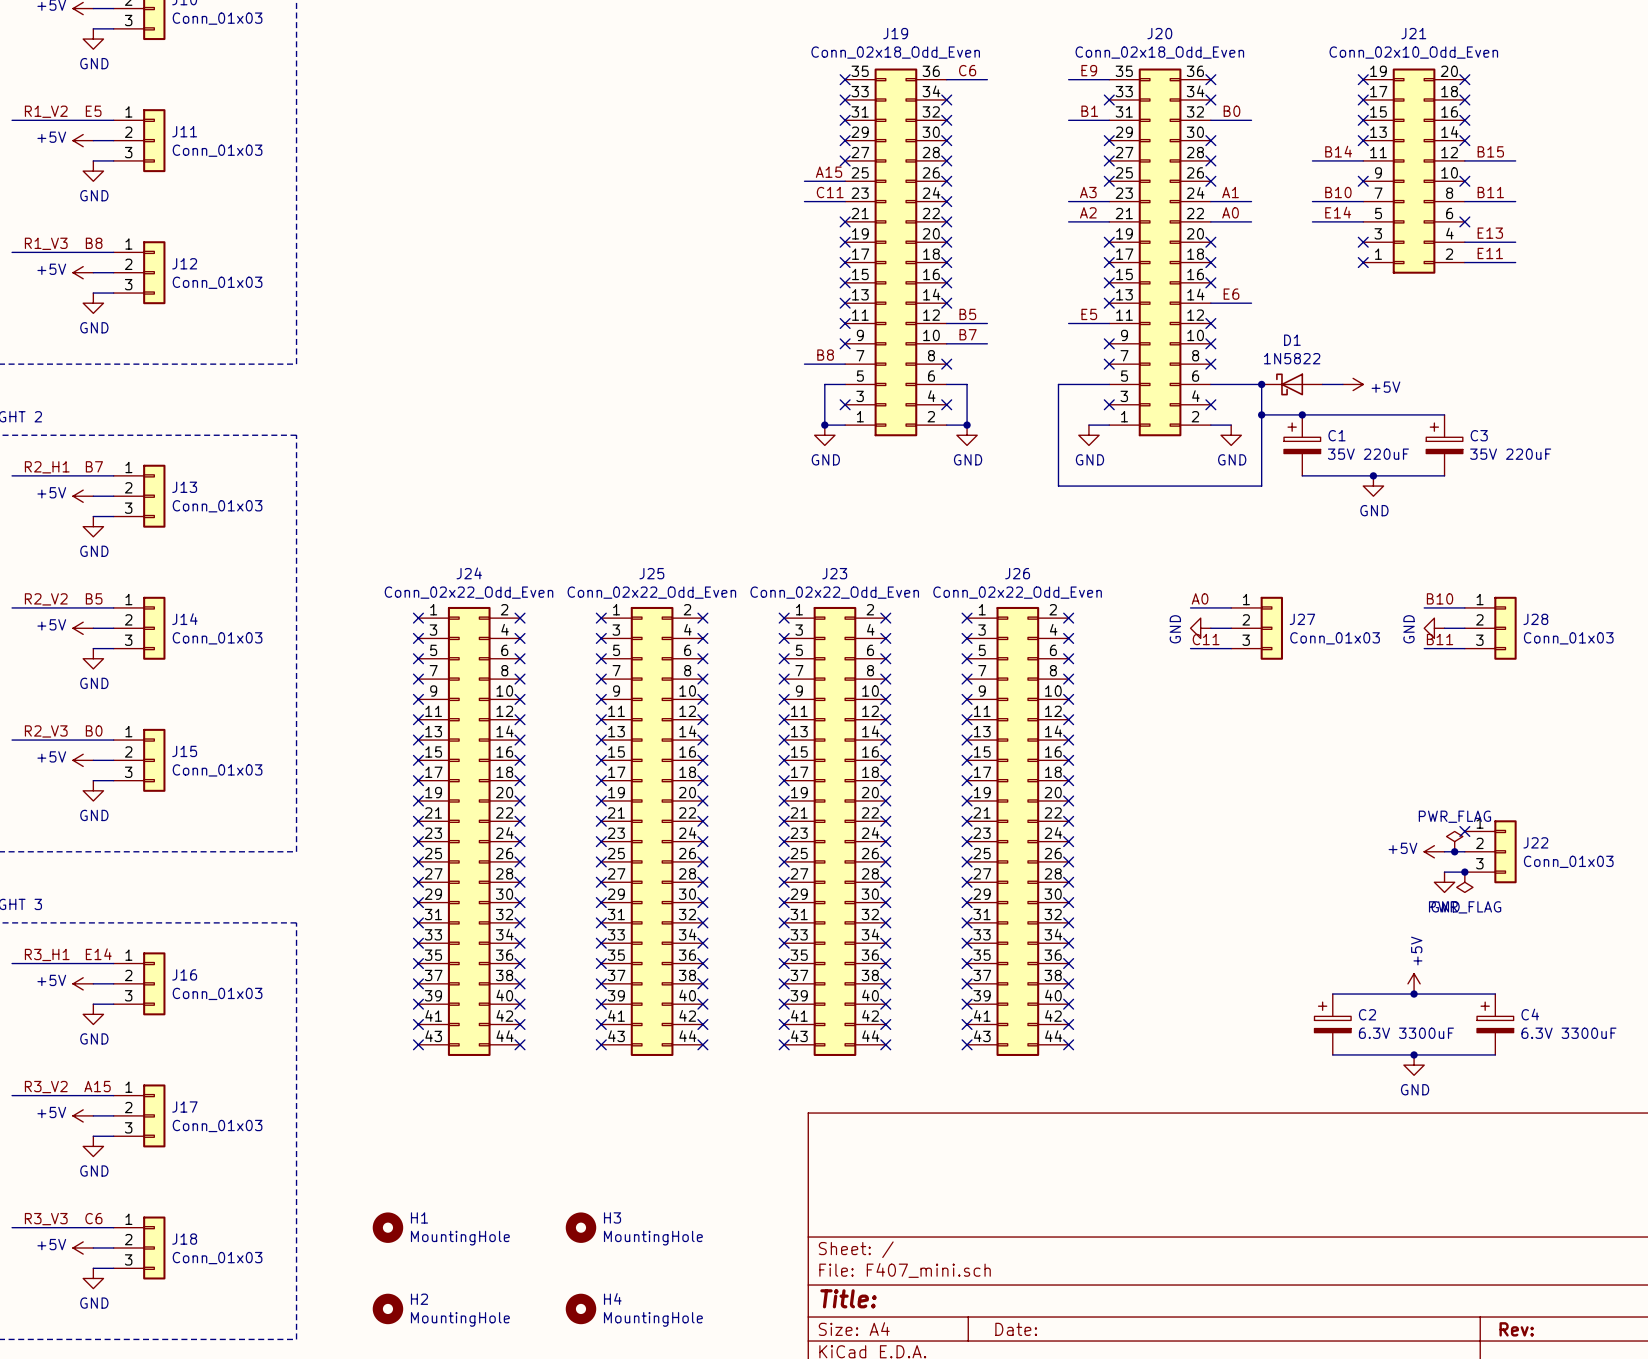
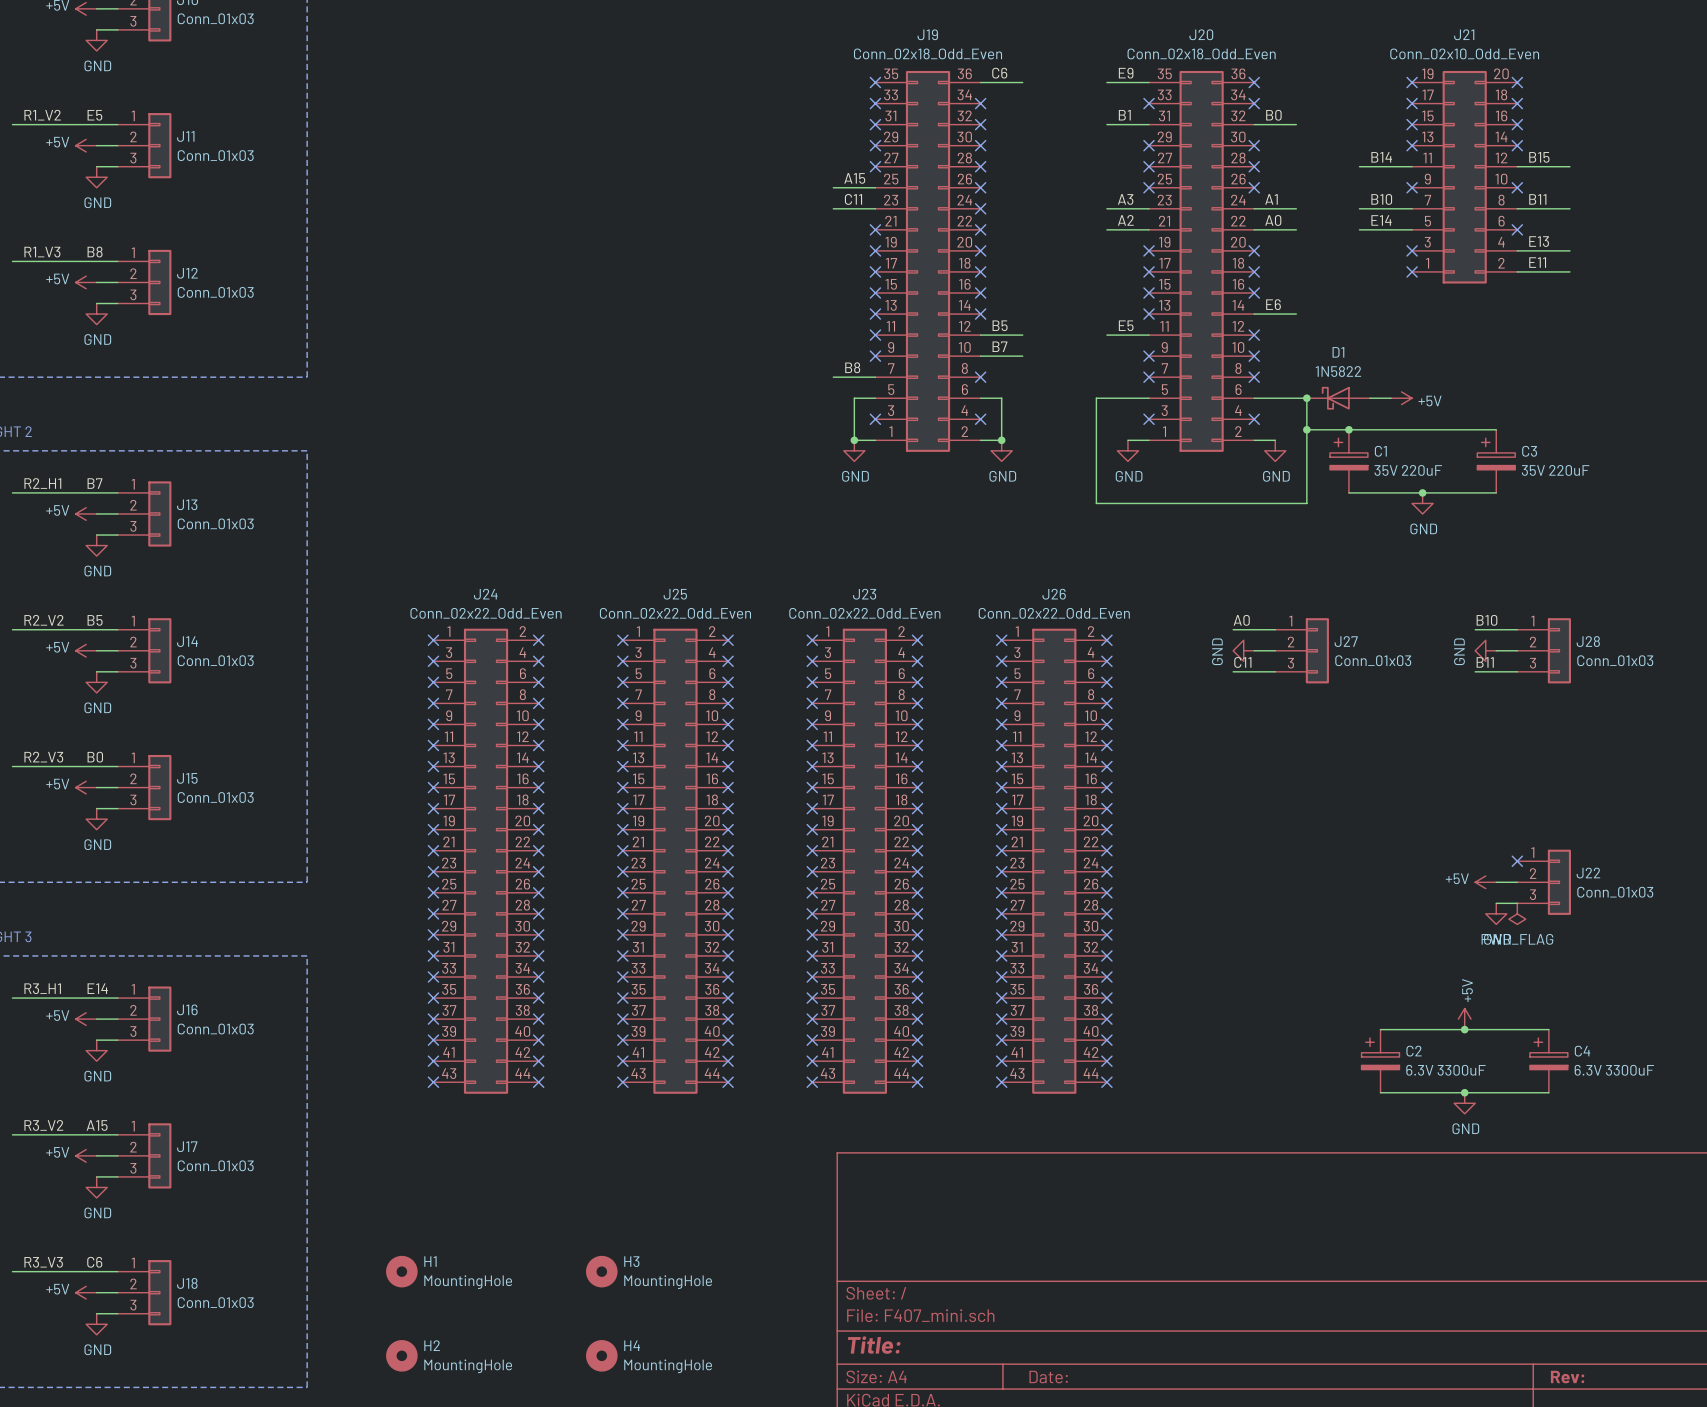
power symbol: PWR_FLAG (1454, 841) -> none
junction: (1454, 851) -> none
junction: (1464, 872) -> none

